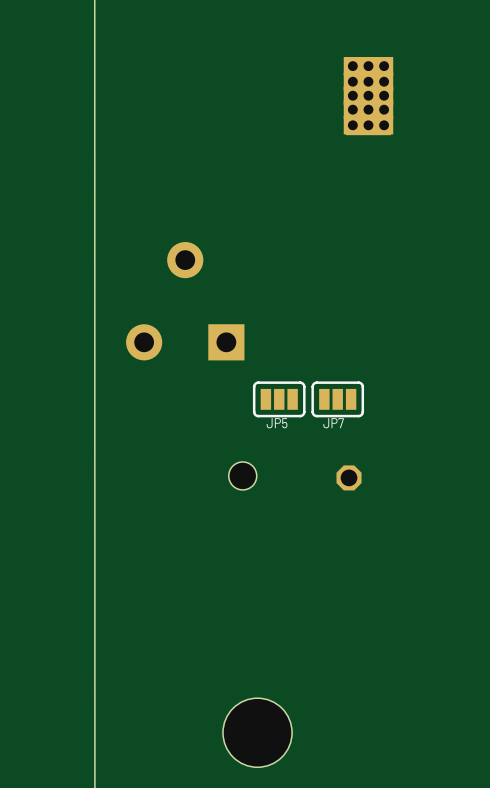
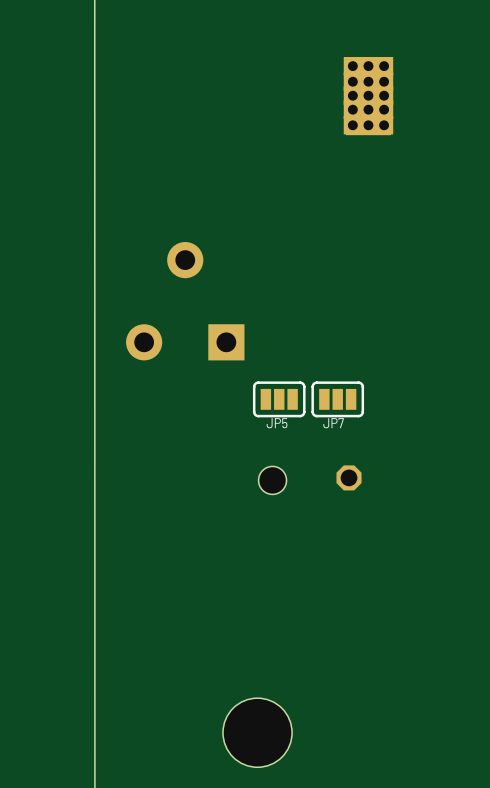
hole position: (242, 475) -> (272, 480)

